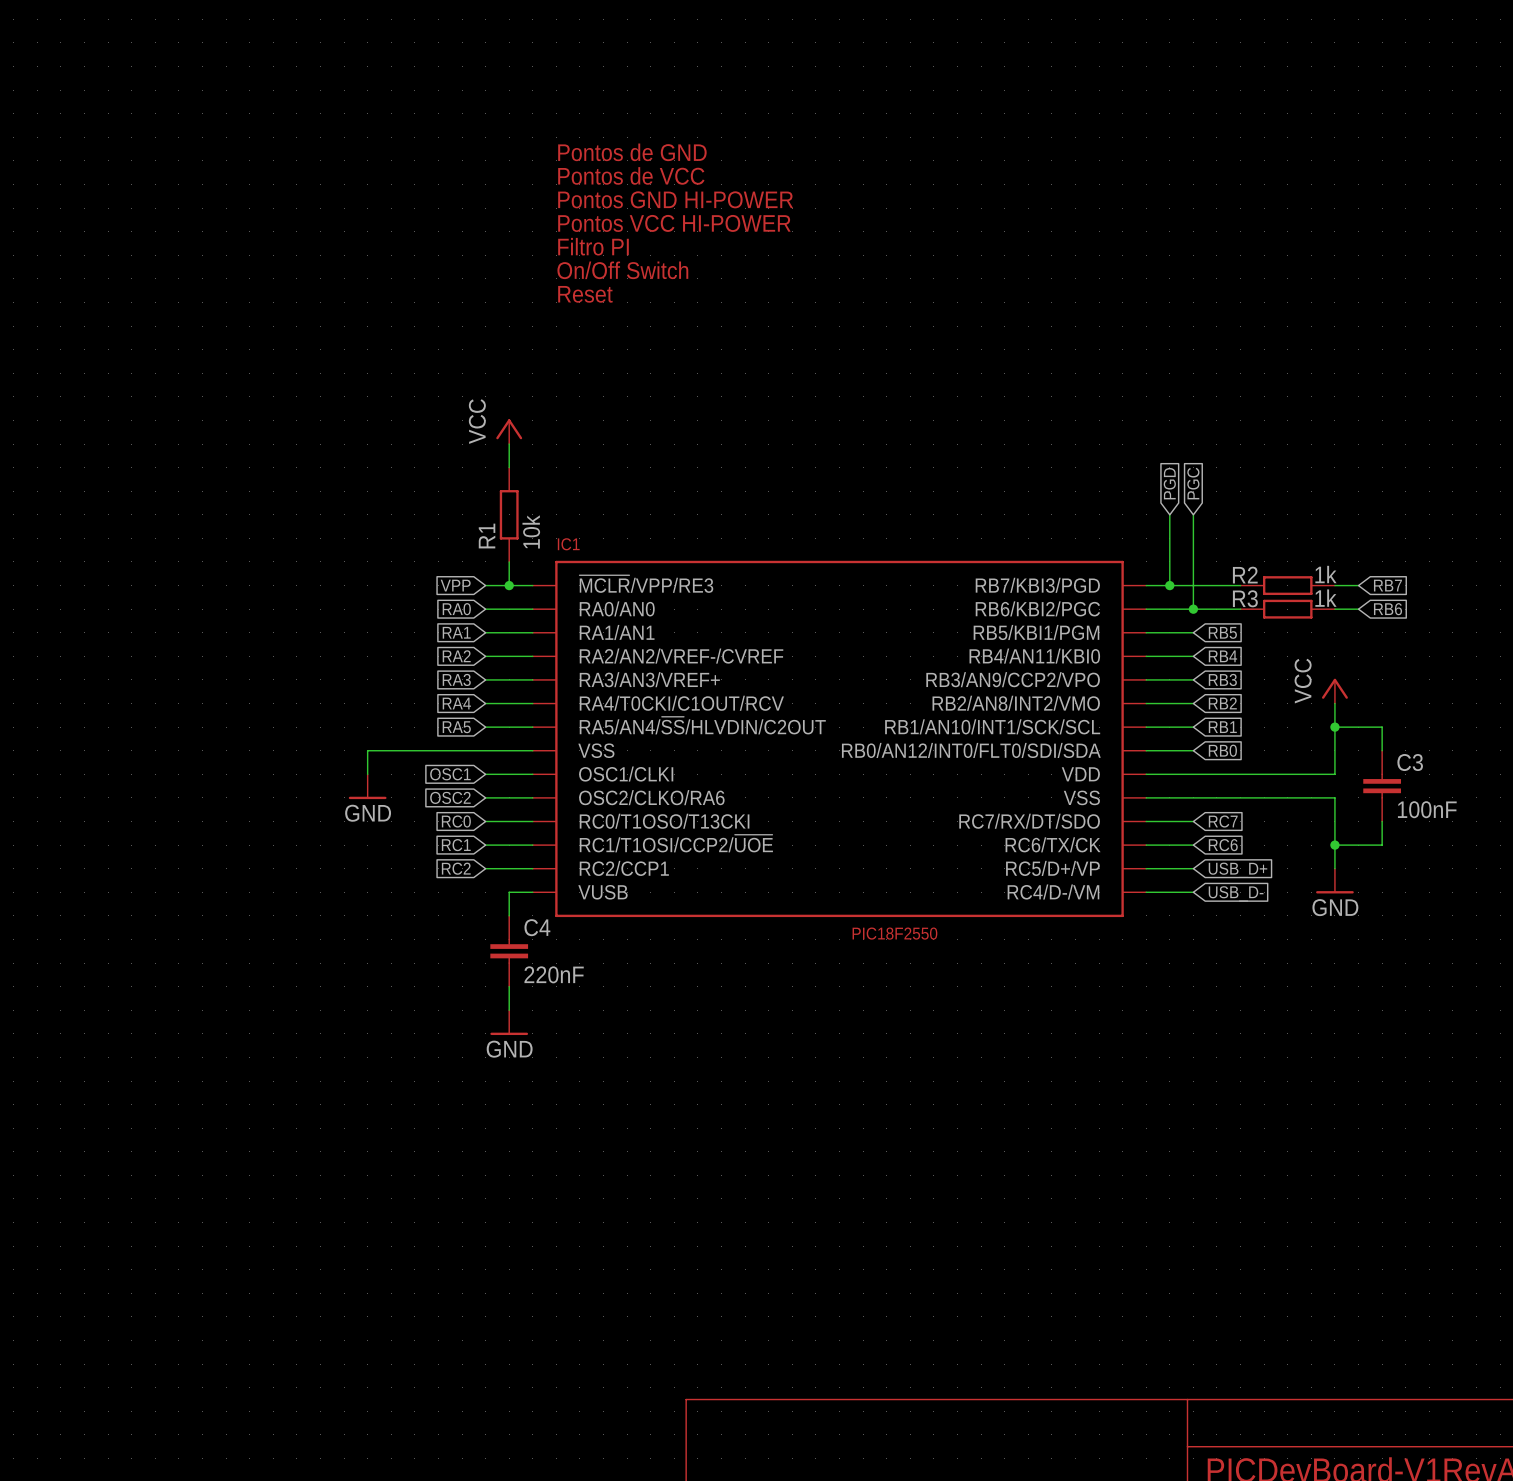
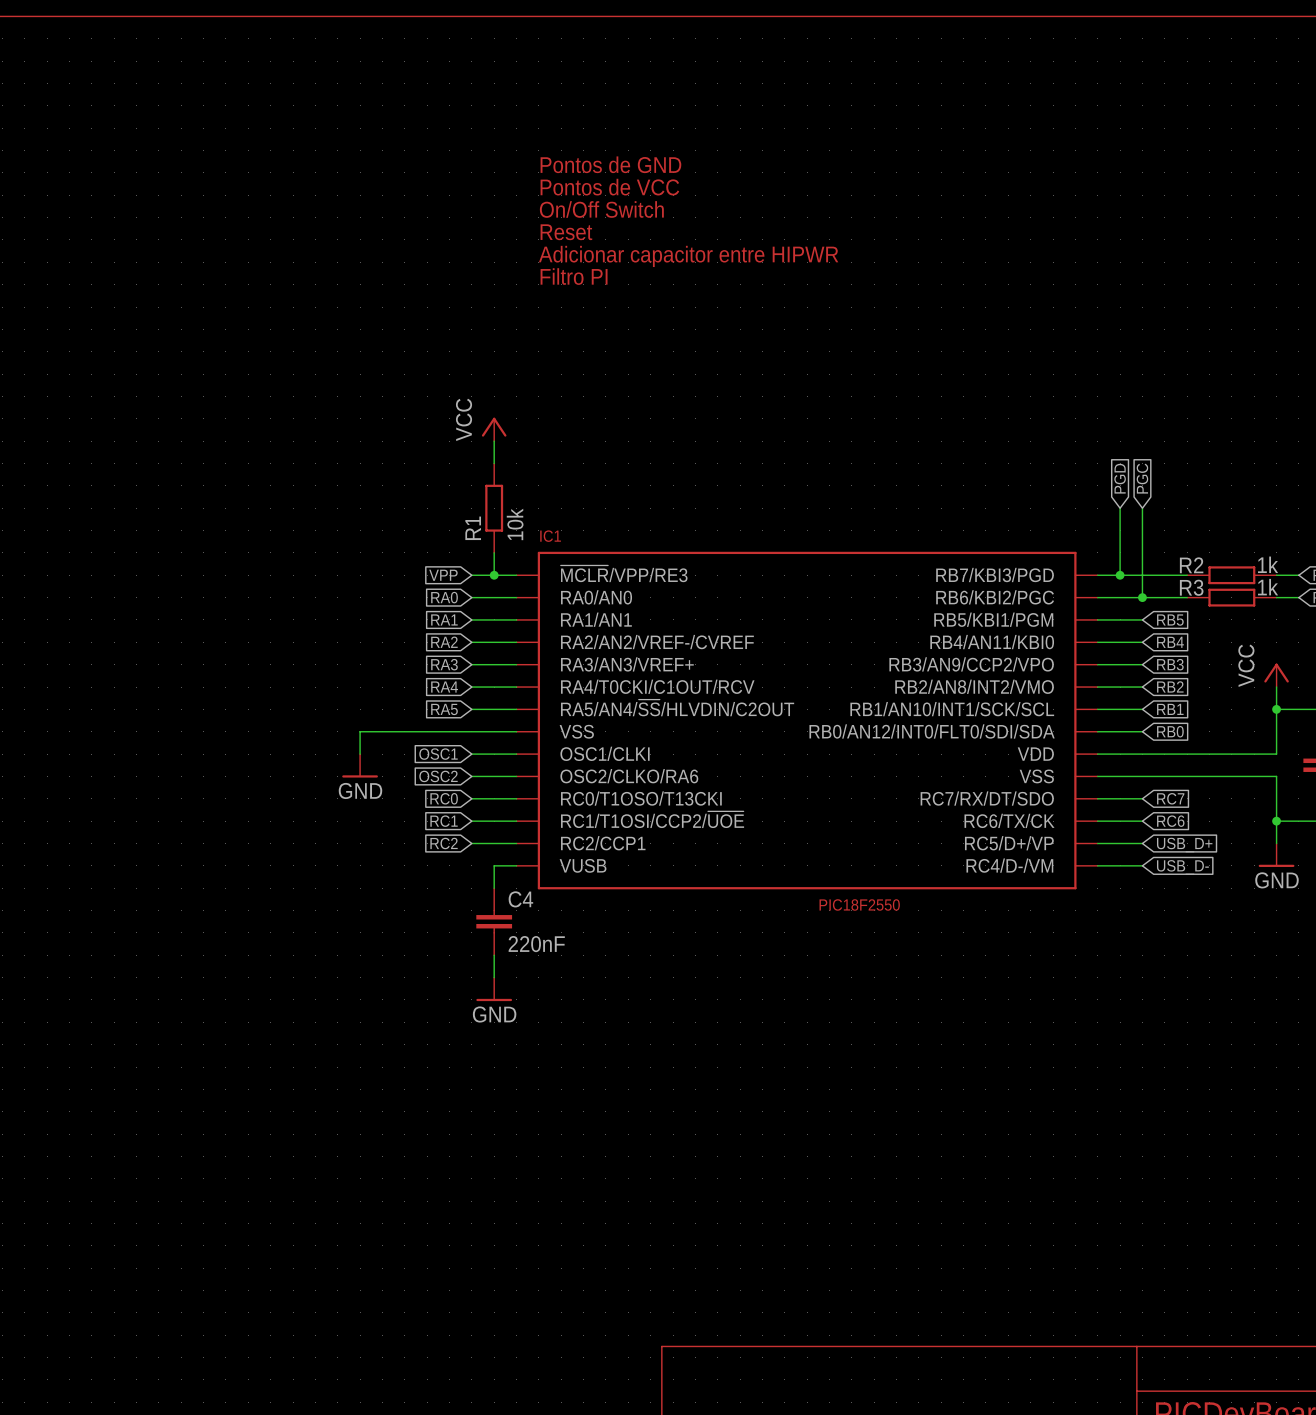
text: Pontos GND HI-POWER (675, 199) -> On/Off Switch (601, 209)
text: Pontos VCC HI-POWER (674, 223) -> Reset (566, 232)
text: Filtro PI (593, 246) -> Adicionar capacitor entre HIPWR (688, 256)
text: On/Off Switch (622, 270) -> Filtro PI (574, 276)
text: Reset (585, 294) -> none

